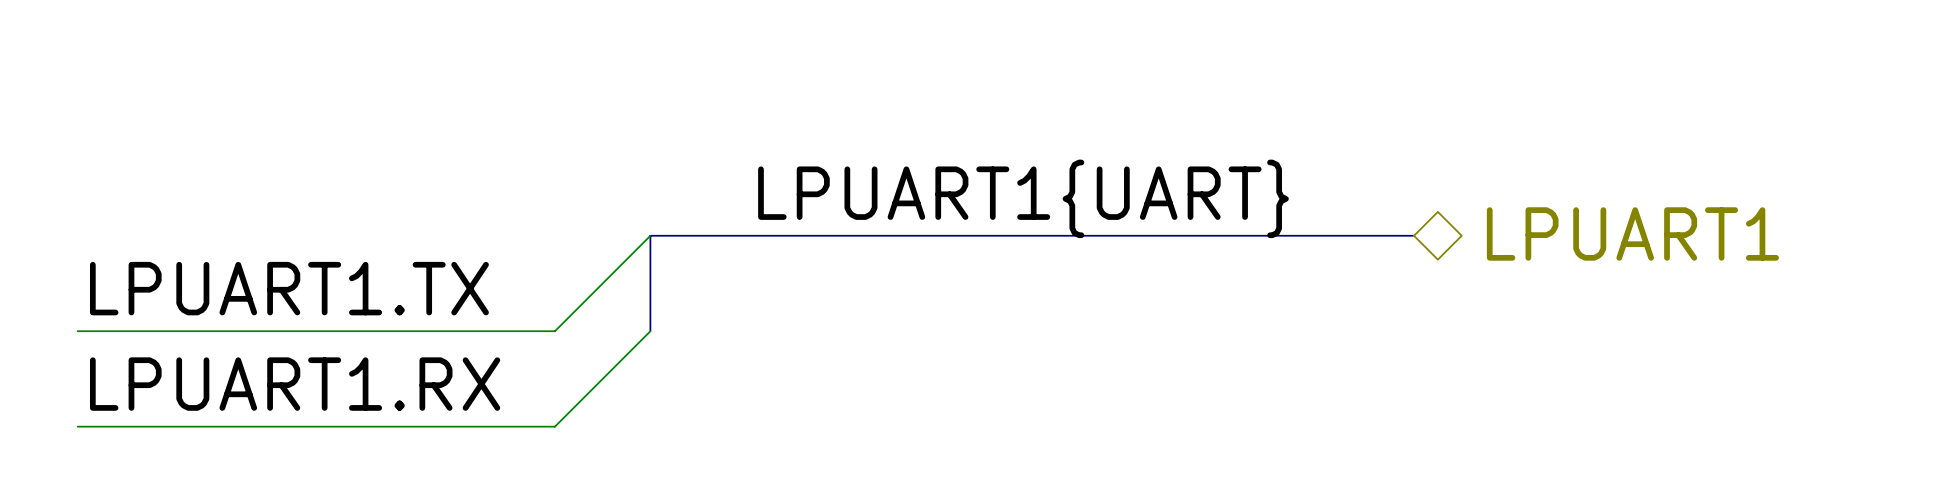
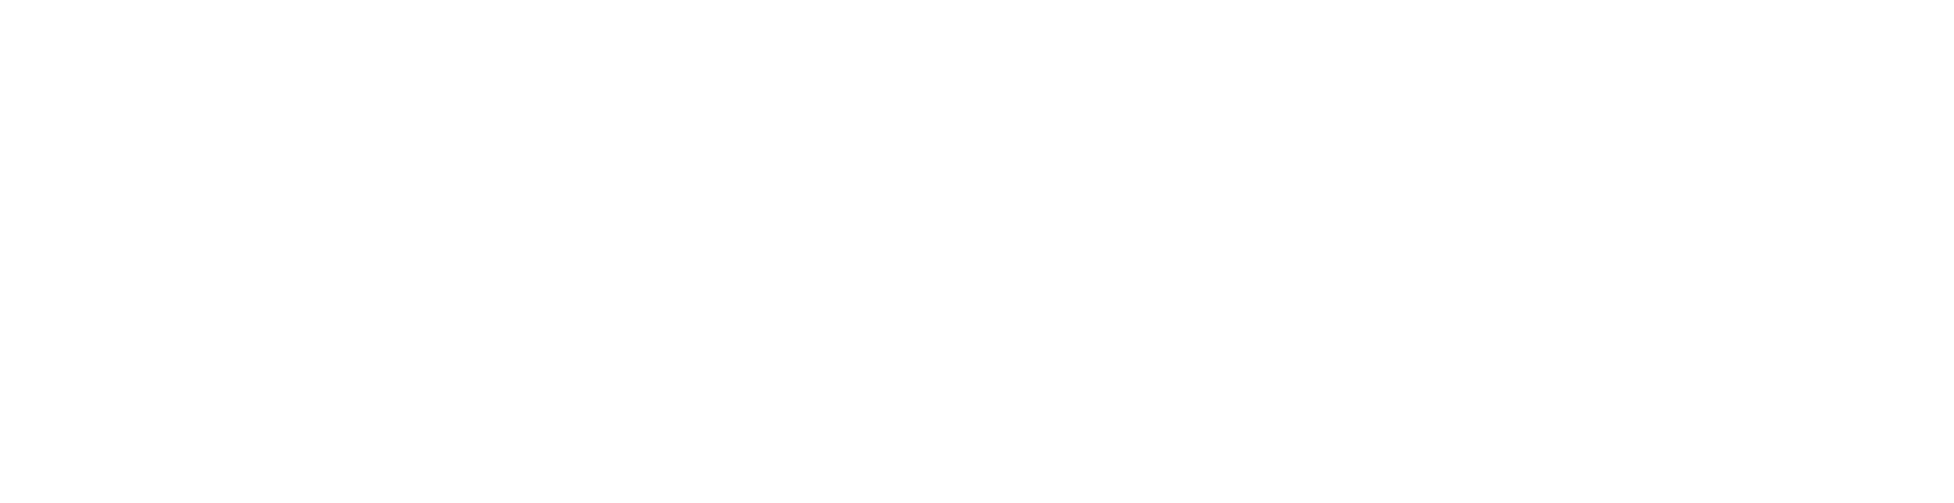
label: LPUART1{UART} (1023, 198) -> none
hierarchical label: LPUART1 (1632, 233) -> none
wire: (650, 235) (554, 331) (77, 331) -> none
bus: (1414, 235) (650, 235) (650, 331) -> none
label: LPUART1.TX (289, 288) -> none
wire: (650, 331) (554, 426) (77, 426) -> none
label: LPUART1.RX (295, 384) -> none

